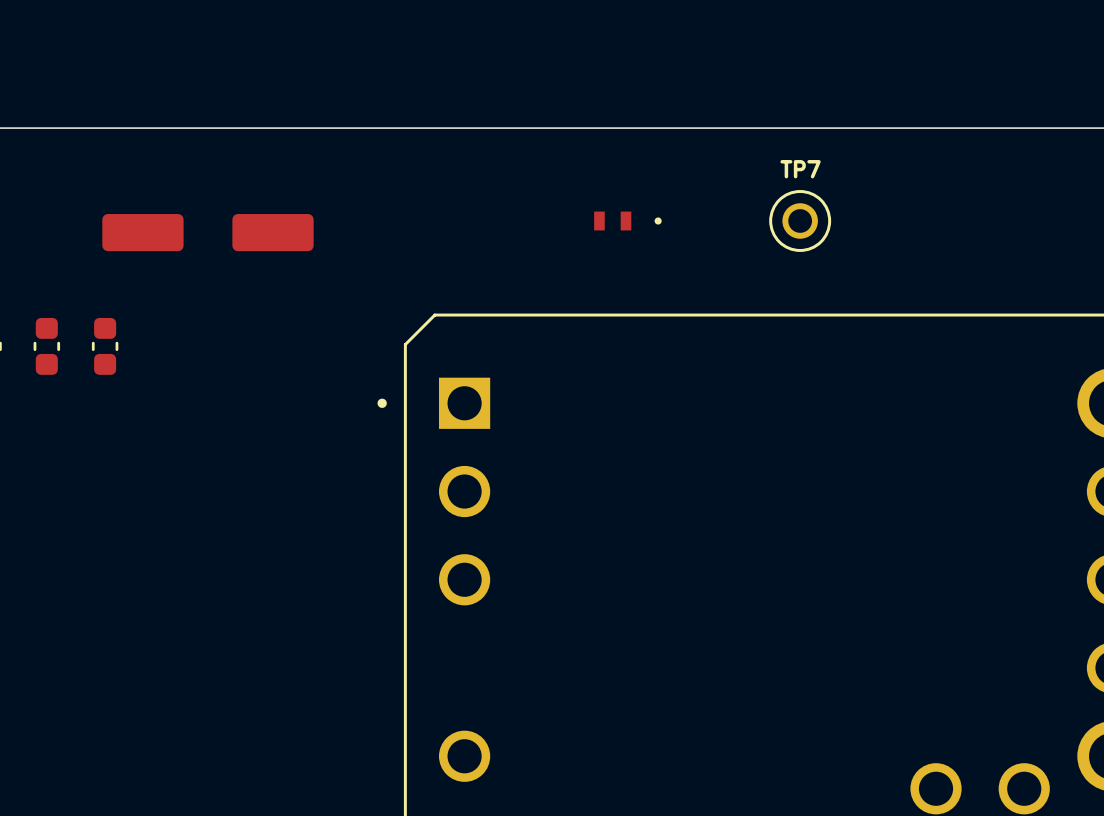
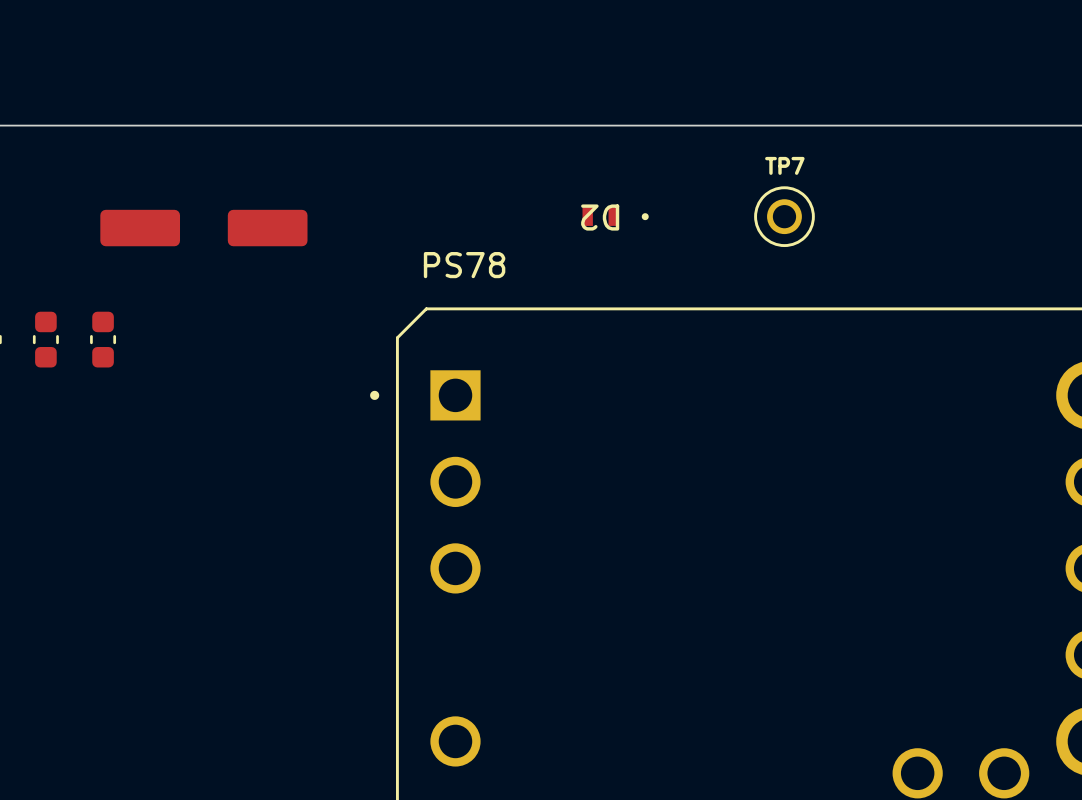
D2 name: none -> D2 (600, 217)
PS78 name: none -> PS78 (464, 265)

